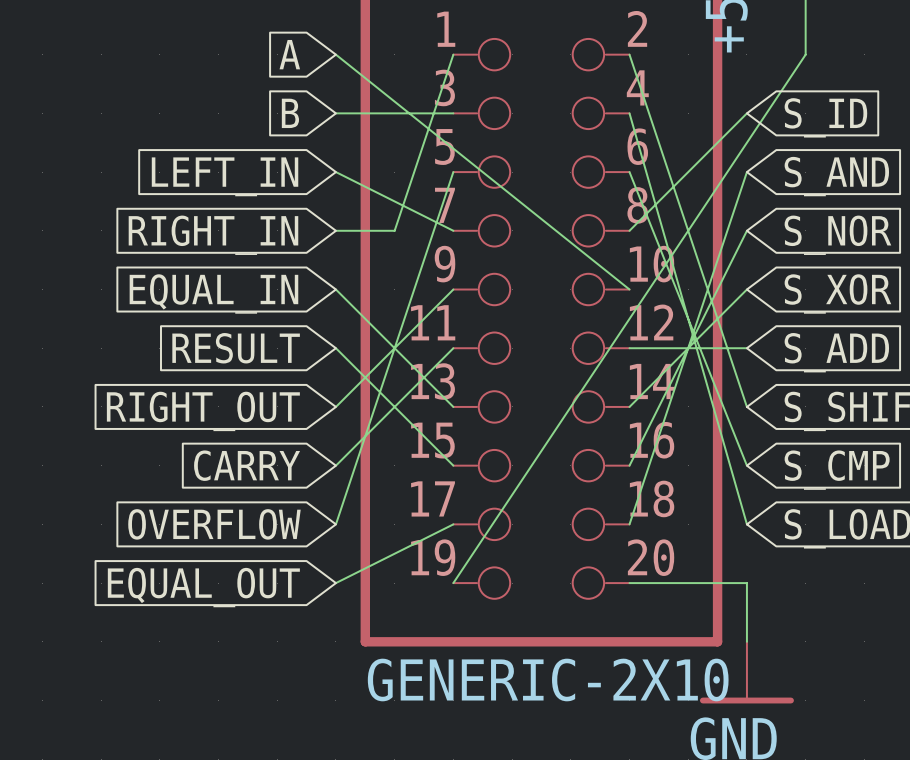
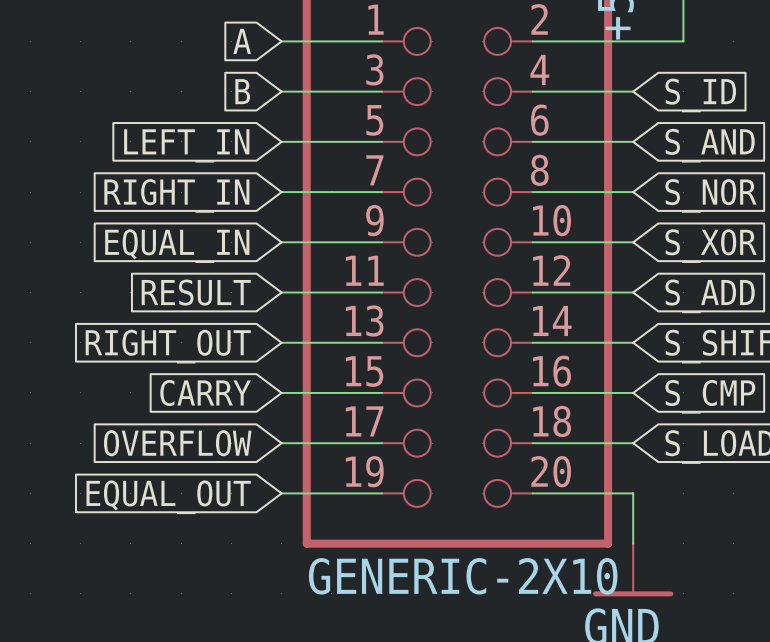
wire: (335, 54) (629, 289) -> (281, 41) (382, 41)
wire: (453, 54) (394, 230) -> (382, 192) (331, 192)
wire: (629, 54) (746, 406) -> (532, 342) (633, 342)
wire: (805, 54) (453, 583) -> (683, 41) (532, 41)
wire: (629, 113) (746, 524) -> none
wire: (746, 113) (629, 230) -> (633, 91) (532, 91)
wire: (335, 172) (453, 230) -> (281, 141) (382, 141)
wire: (453, 172) (335, 524) -> none
wire: (629, 172) (746, 465) -> (532, 141) (633, 141)
wire: (746, 172) (629, 524) -> (633, 443) (532, 443)
wire: (746, 230) (629, 465) -> (633, 192) (532, 192)
wire: (335, 289) (453, 406) -> (281, 242) (382, 242)
wire: (453, 289) (335, 406) -> (382, 342) (281, 342)
wire: (746, 289) (629, 406) -> (633, 242) (532, 242)
wire: (335, 348) (453, 465) -> (281, 292) (382, 292)
wire: (453, 348) (335, 465) -> (382, 392) (281, 392)
wire: none -> (532, 392) (633, 392)
wire: (453, 524) (335, 583) -> (382, 443) (281, 443)
wire: none -> (281, 493) (382, 493)

